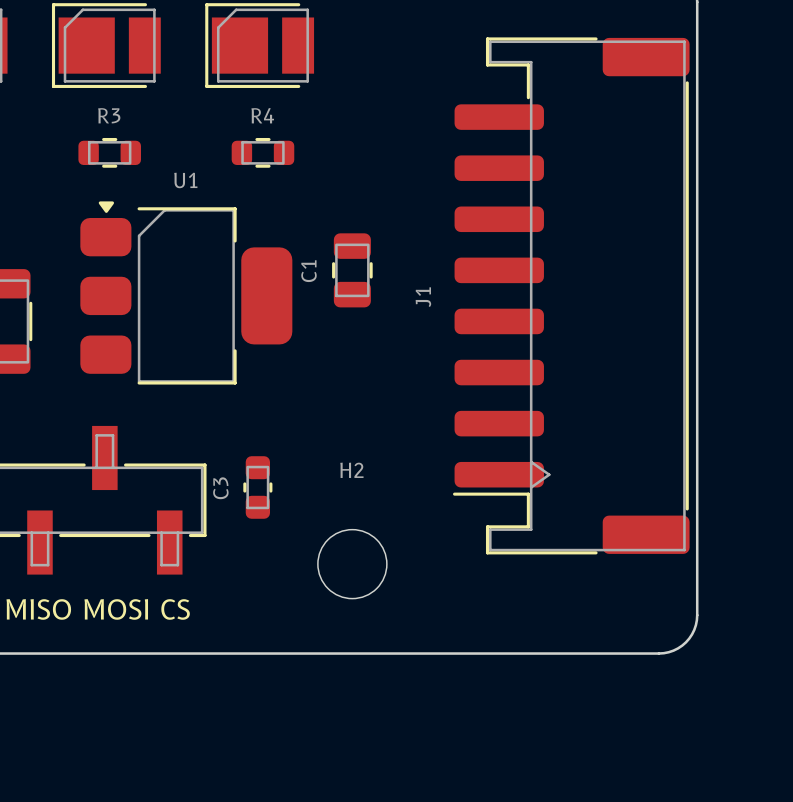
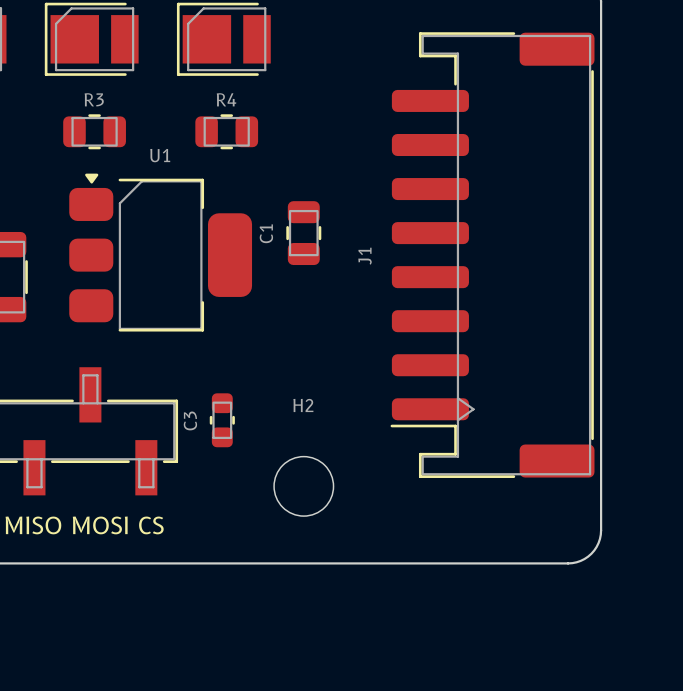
R3 footprint: [78, 137, 142, 168] -> [63, 114, 126, 150]
R4 footprint: [231, 137, 295, 168] -> [195, 114, 259, 150]

